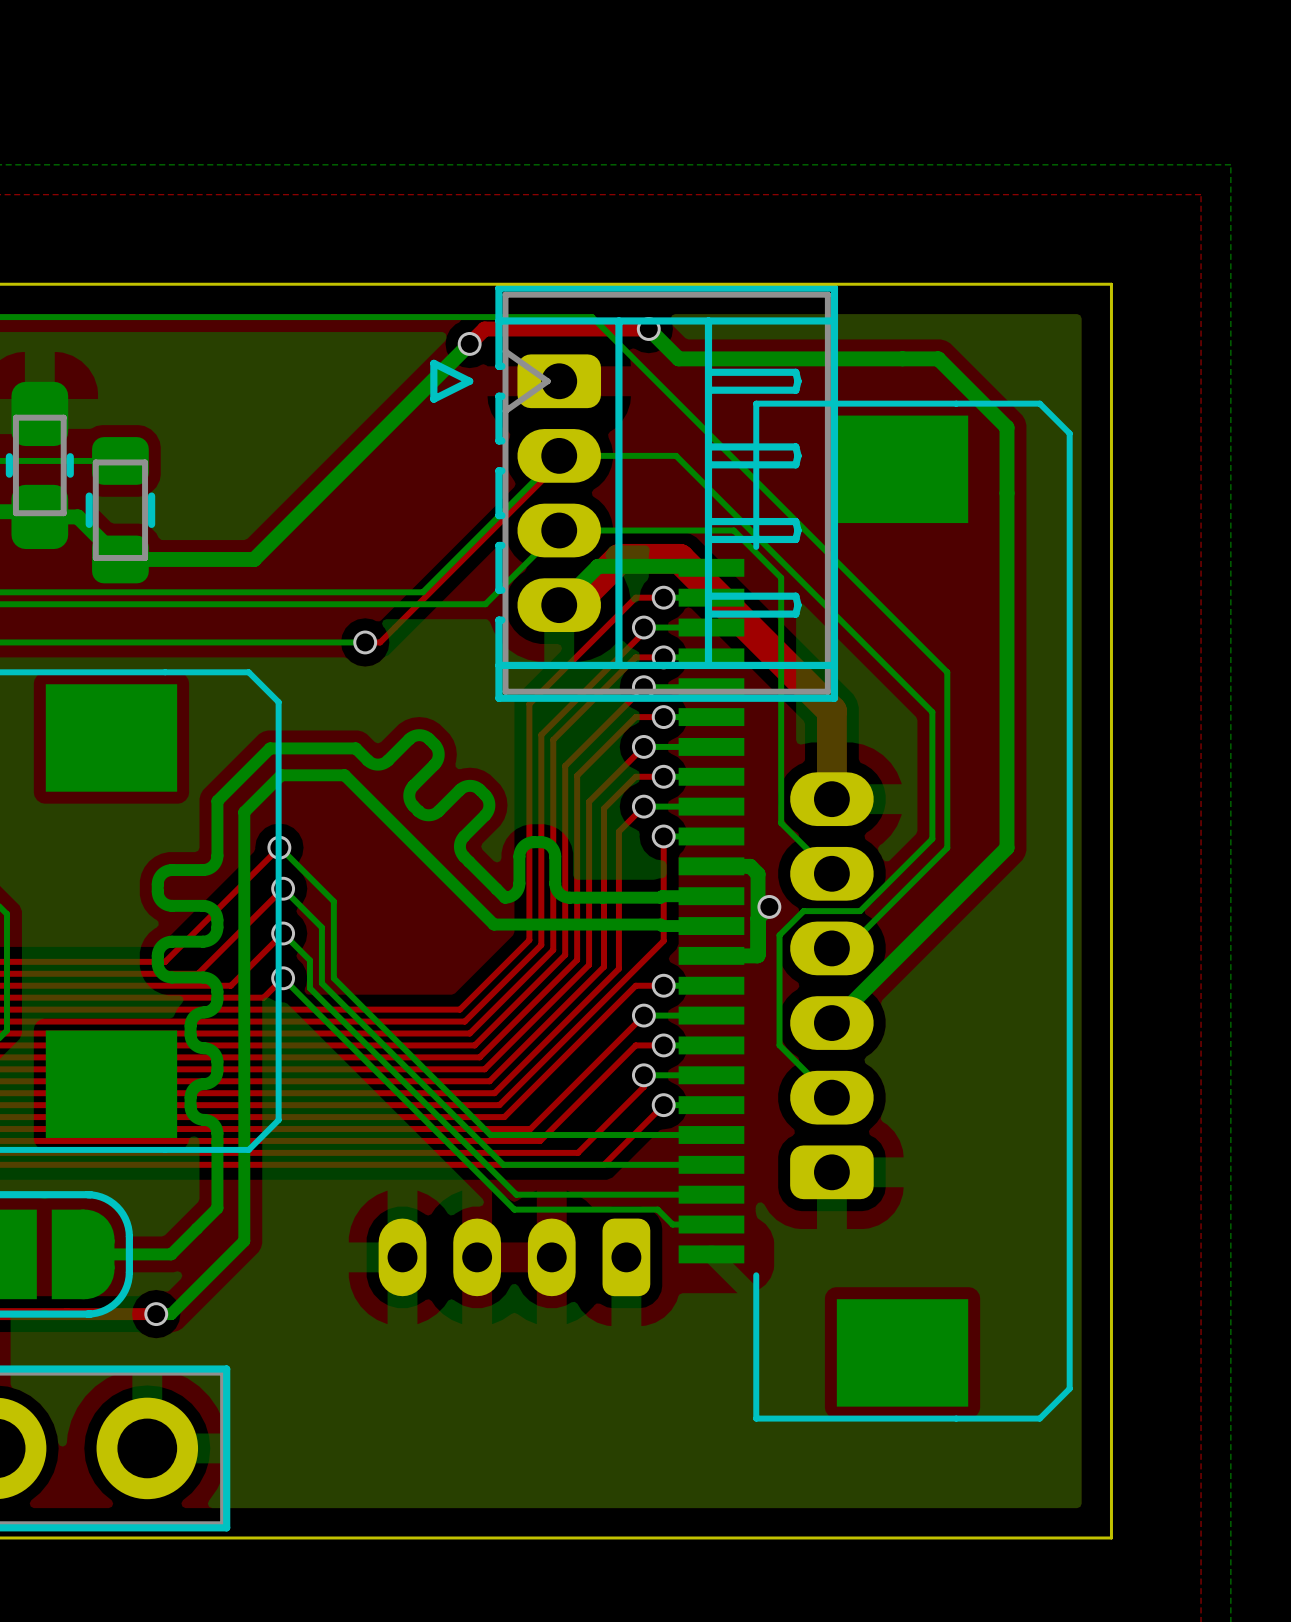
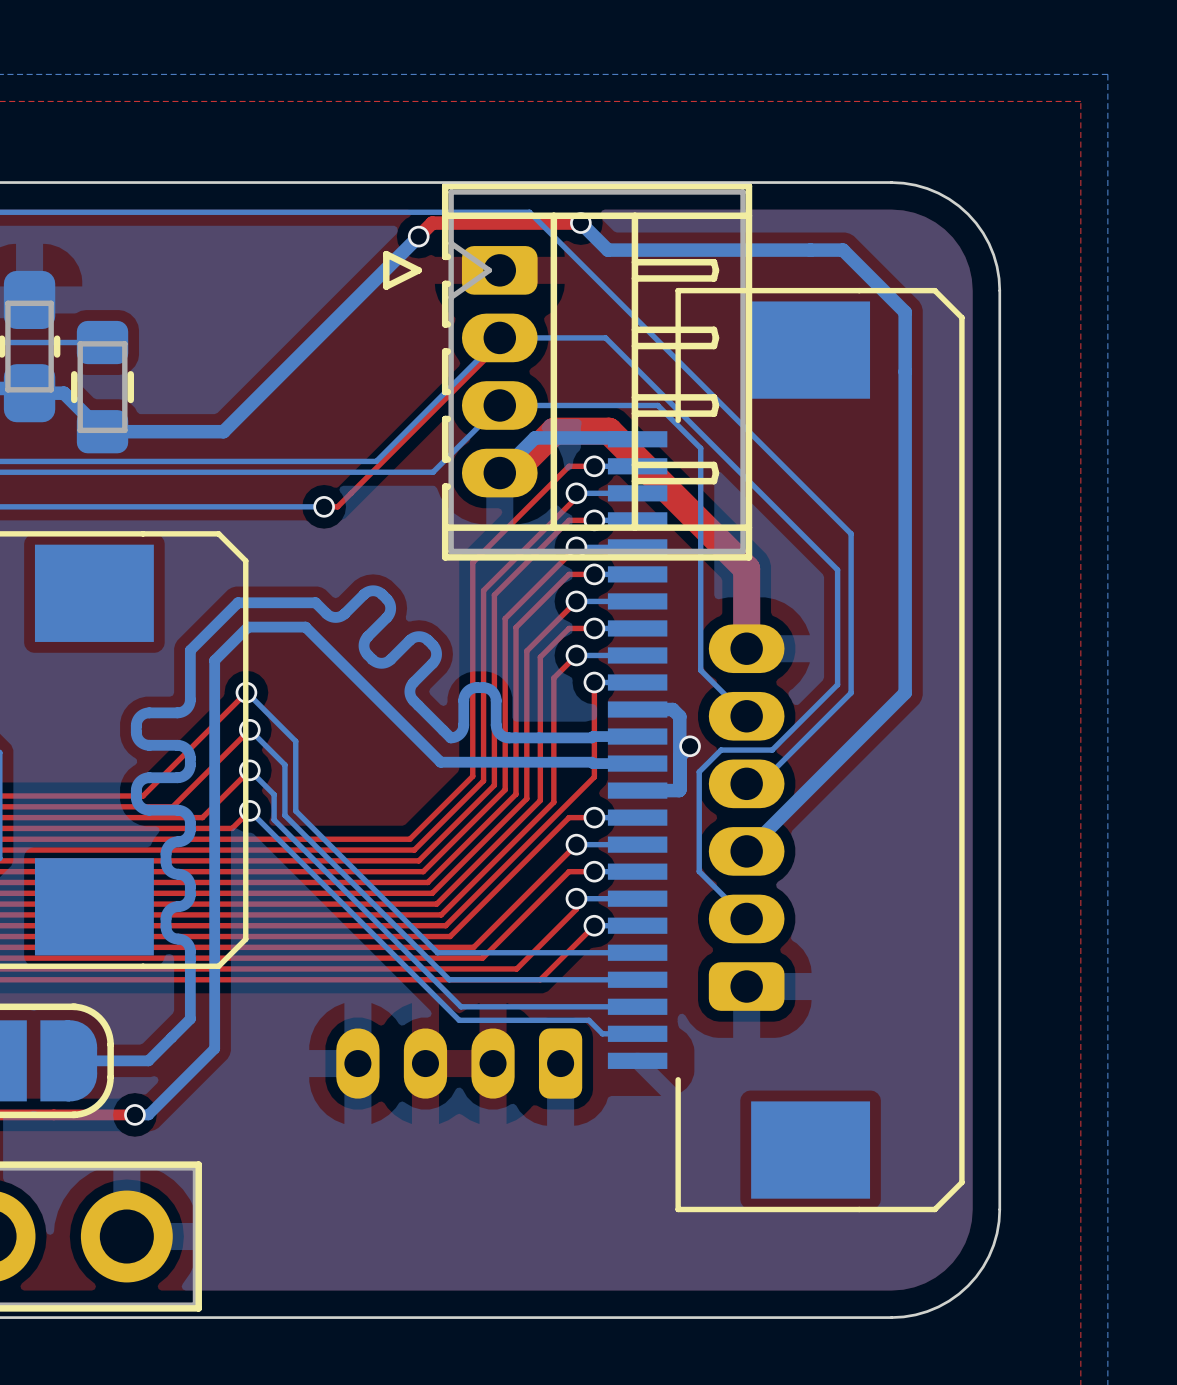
board edge: (992, 284) (1111, 284) (1111, 403) -> (891, 182) (927, 188) (949, 199) (968, 214) (983, 233) (993, 254) (999, 290)
board edge: (1111, 1418) (1111, 1537) (992, 1537) -> (999, 1209) (997, 1233) (989, 1256) (968, 1285) (938, 1306) (915, 1314) (891, 1317)

